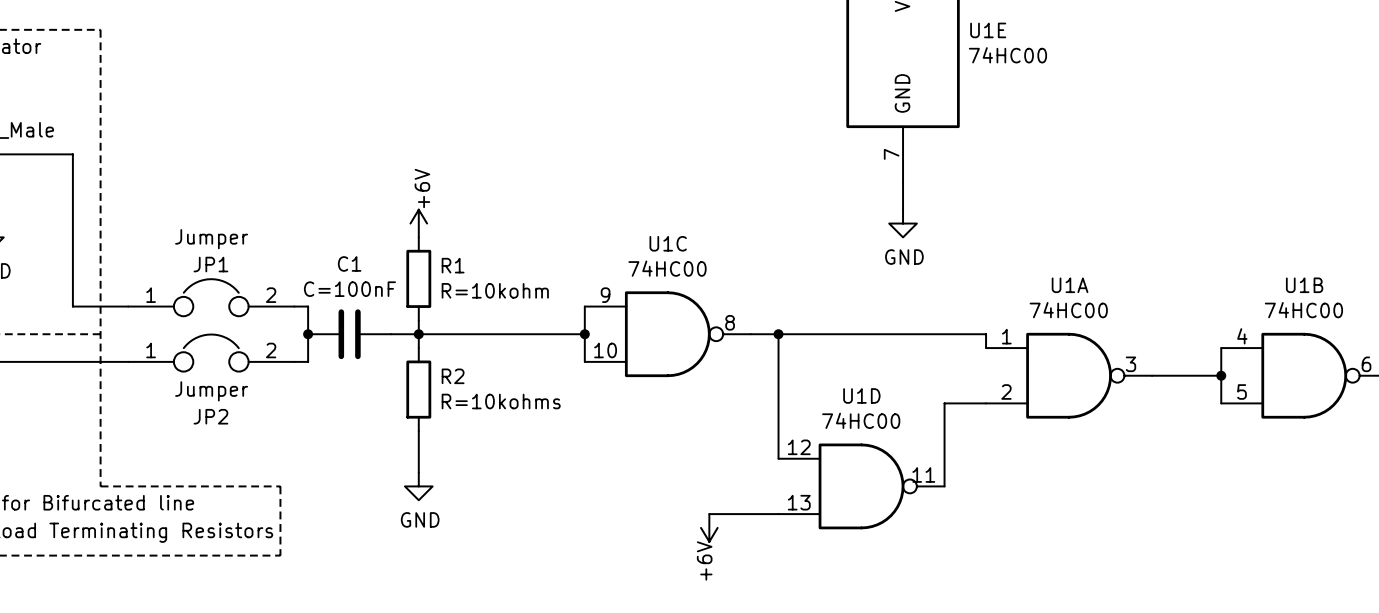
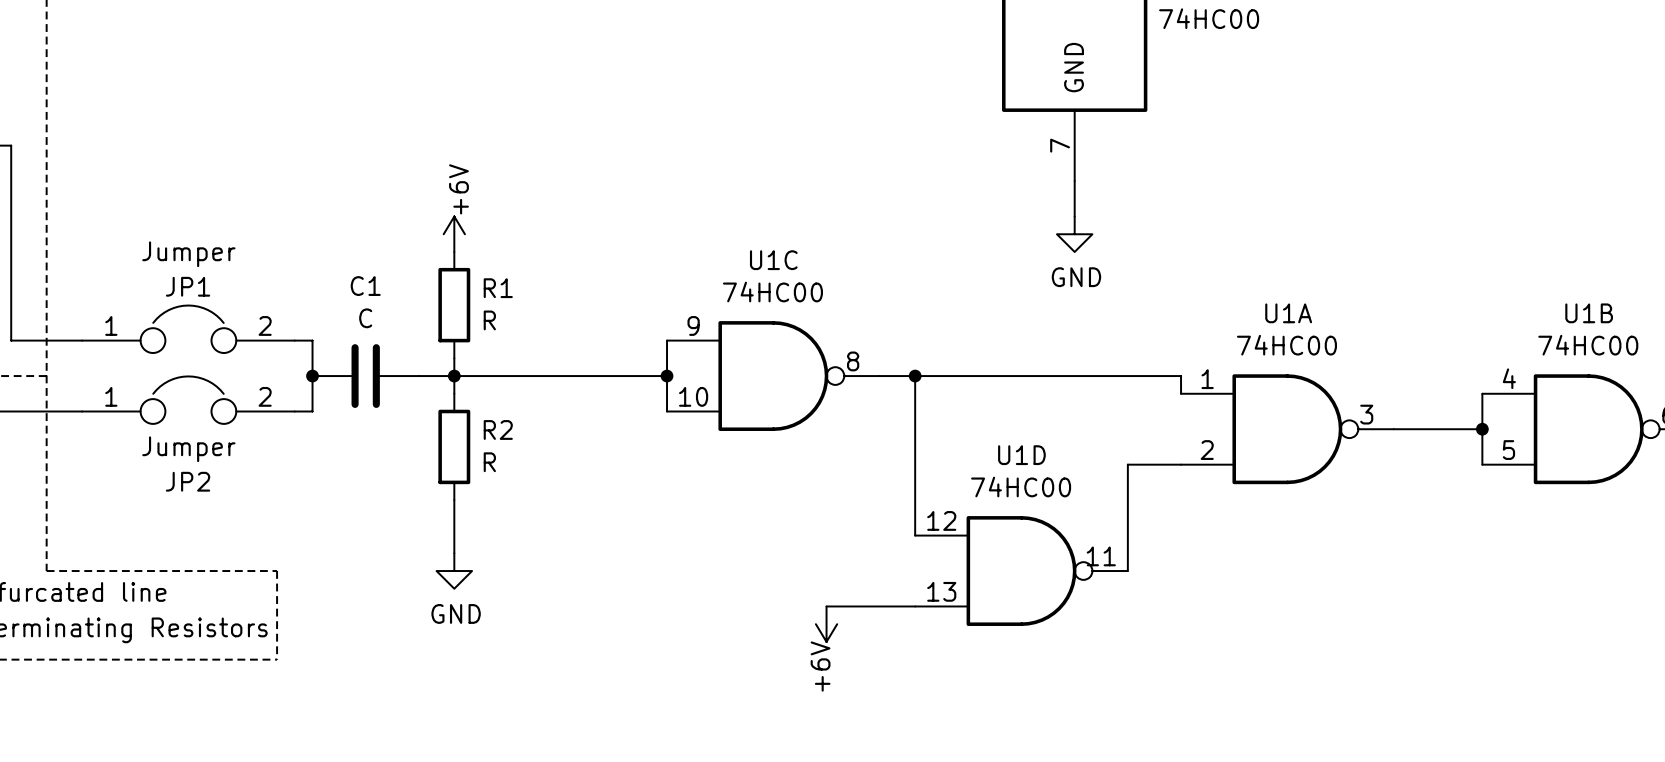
C1 value: C=100nF (349, 289) -> C (365, 318)
R1 value: R=10kohm (495, 290) -> R (489, 320)
R2 value: R=10kohms (501, 401) -> R (489, 462)

